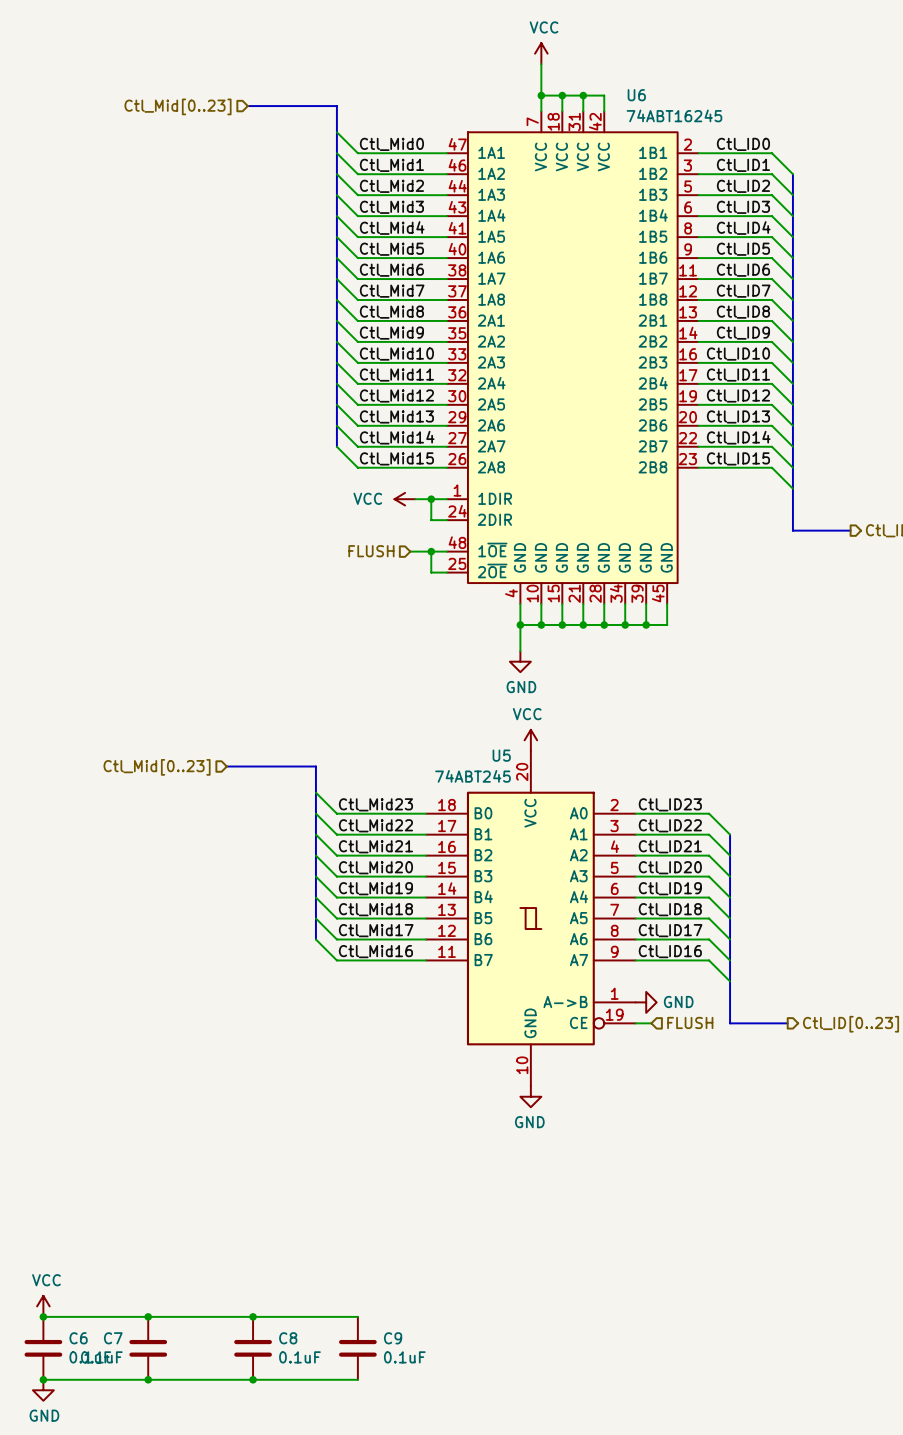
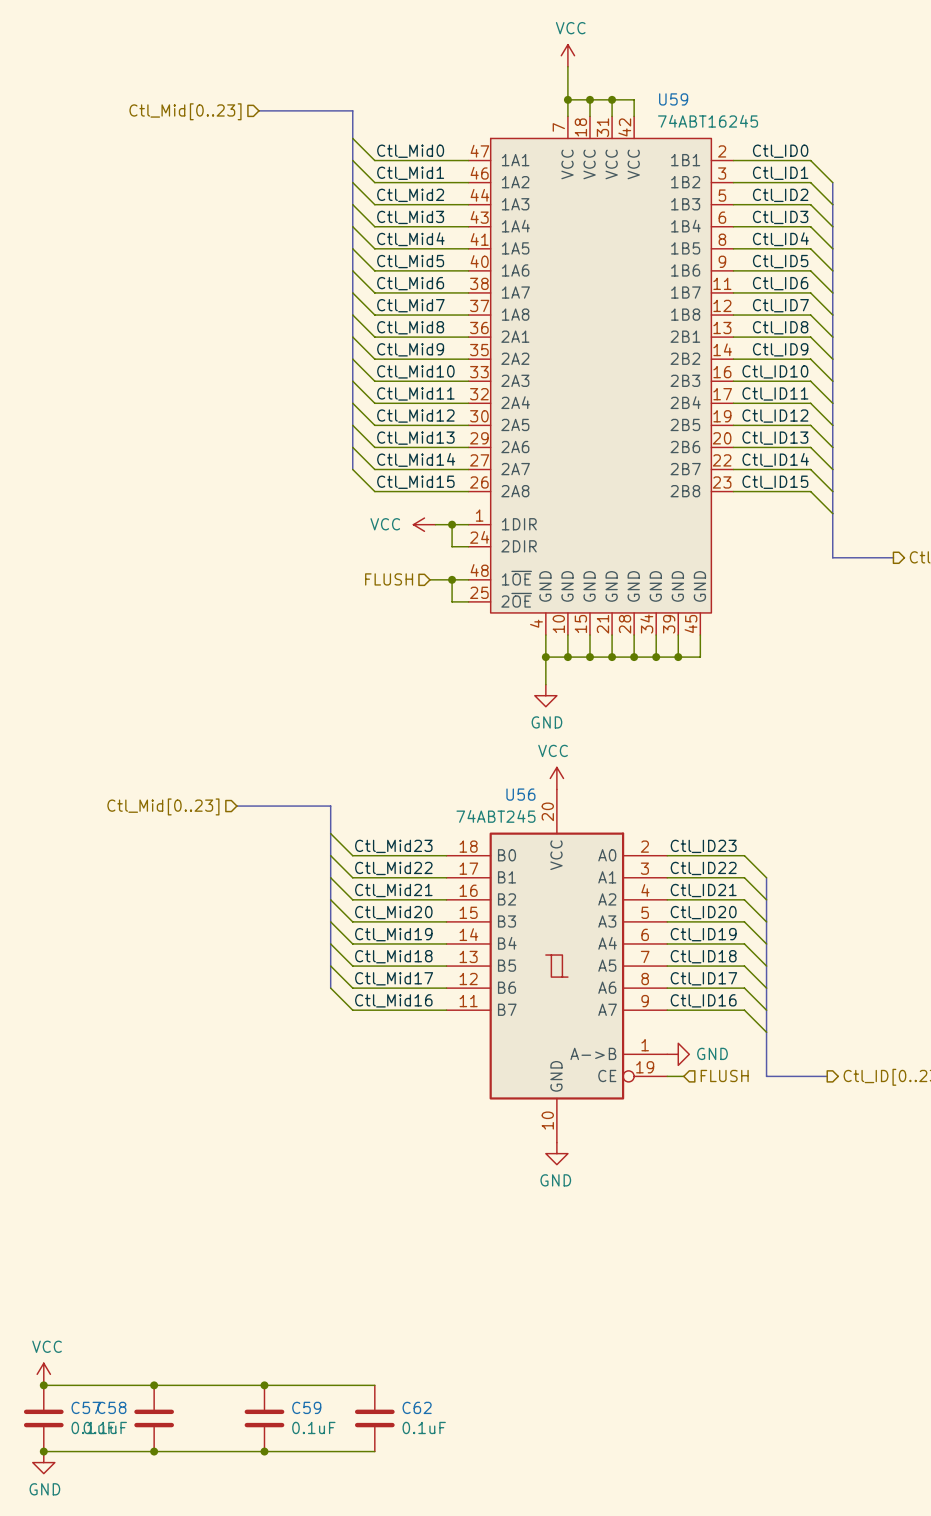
U6 name: U6 (636, 95) -> U59 (673, 99)
U5 name: U5 (501, 755) -> U56 (520, 794)
C6 name: C6 (78, 1338) -> C57 (86, 1407)
C7 name: C7 (113, 1338) -> C58 (111, 1407)
C8 name: C8 (288, 1338) -> C59 (306, 1407)
C9 name: C9 (393, 1338) -> C62 (417, 1407)

